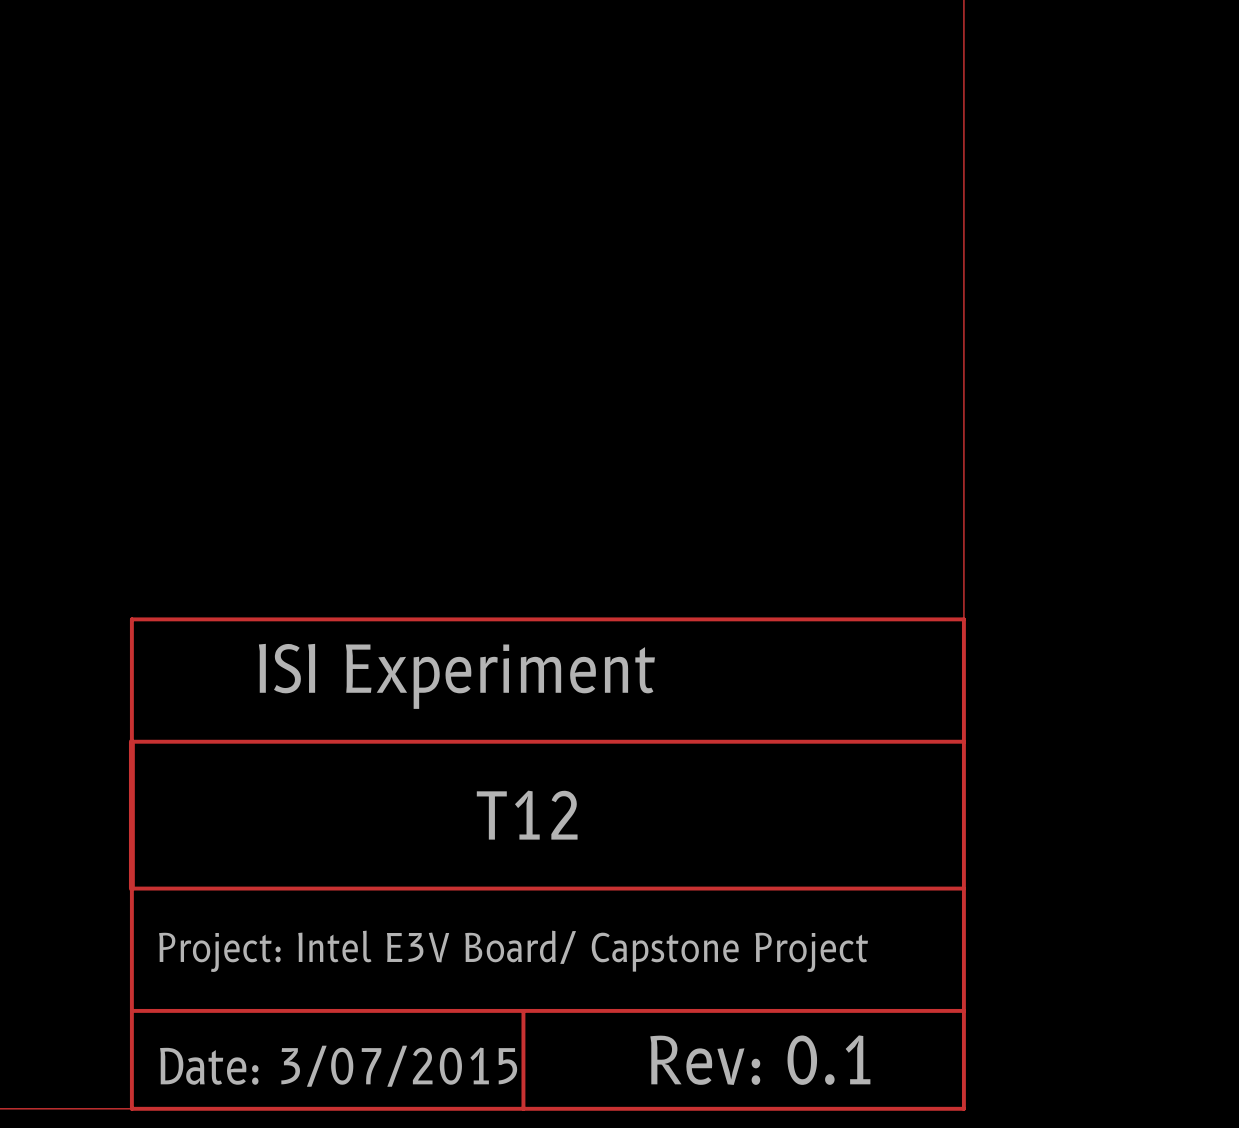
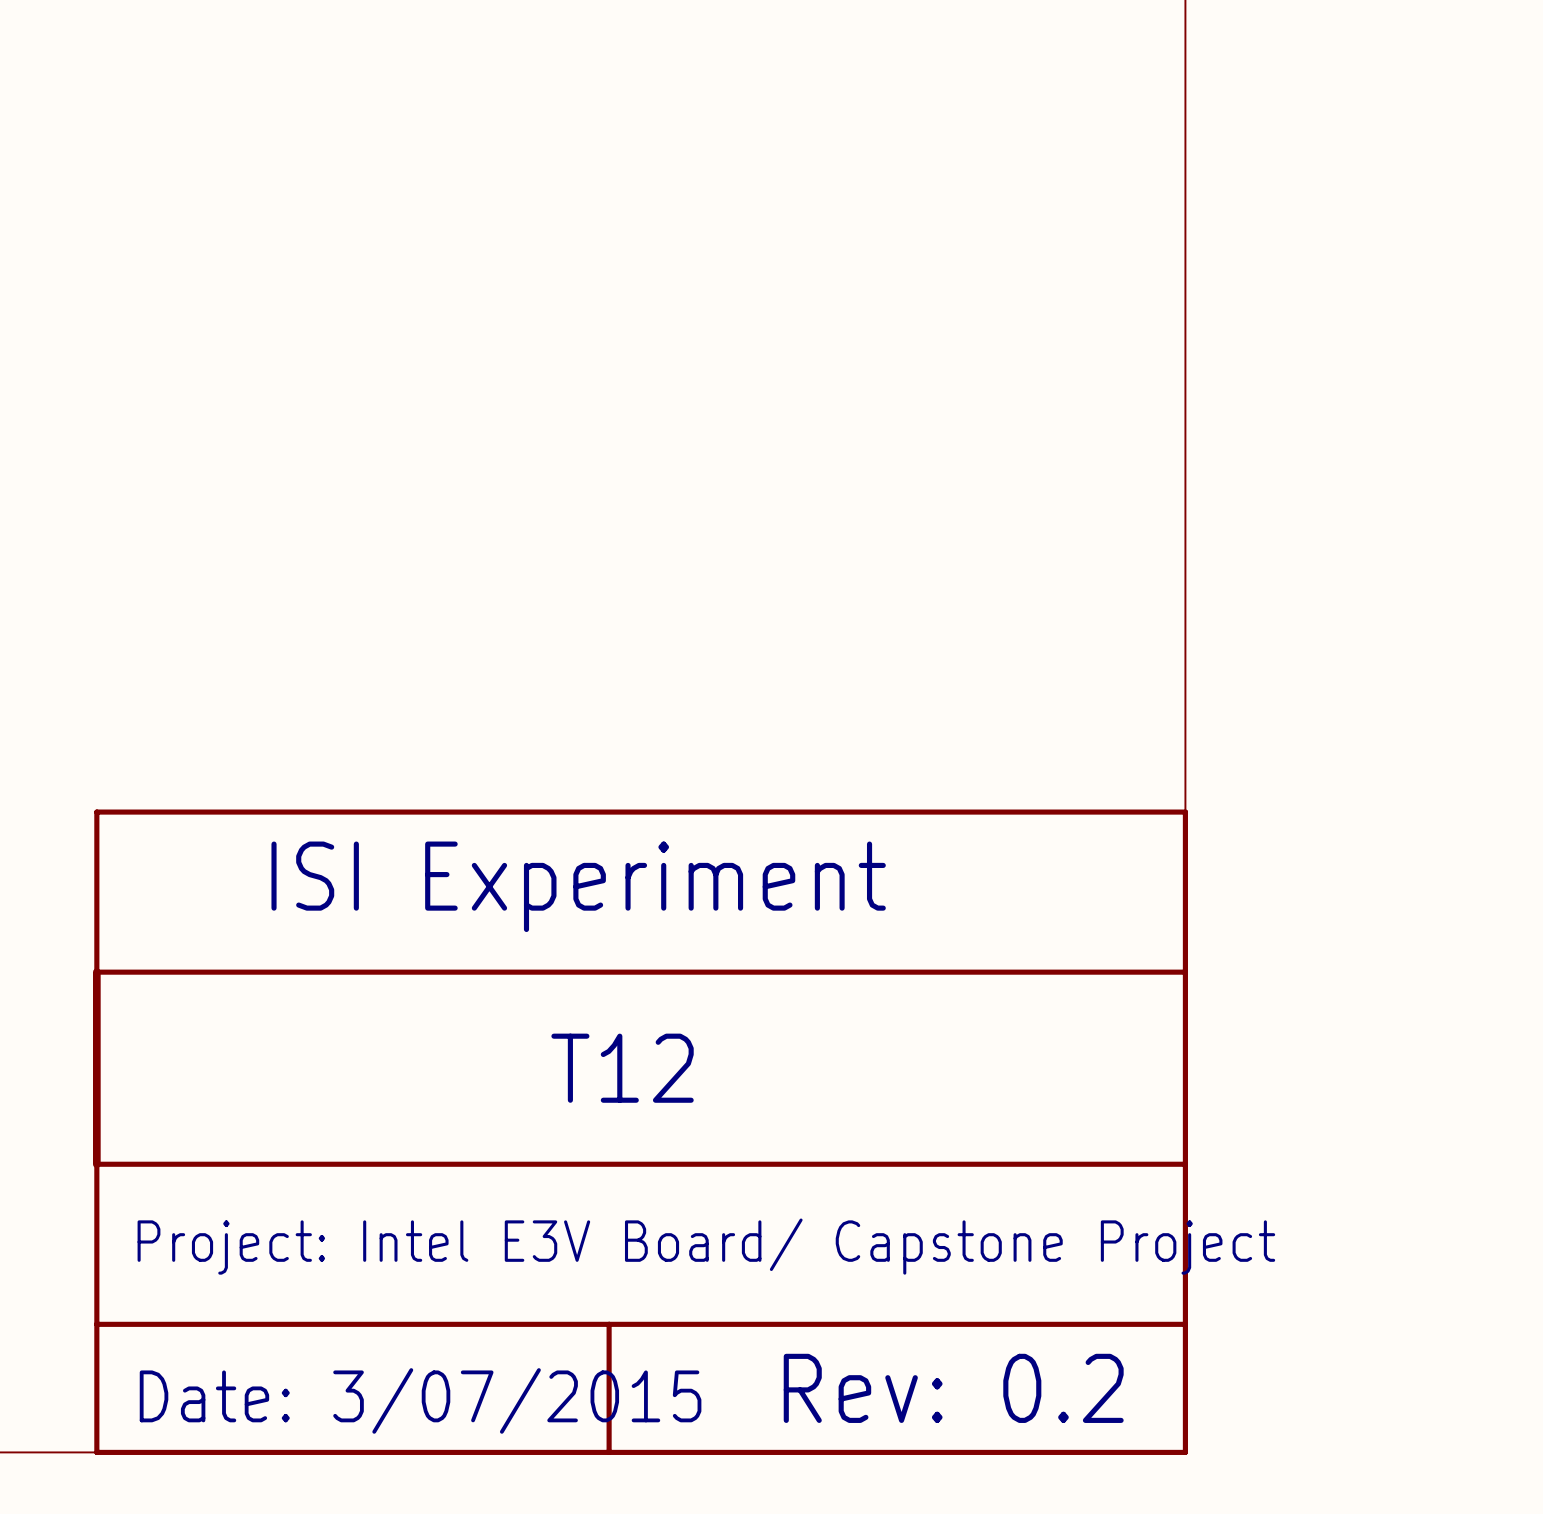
text: Rev: 0.1 (760, 1060) -> Rev: 0.2 (953, 1388)

